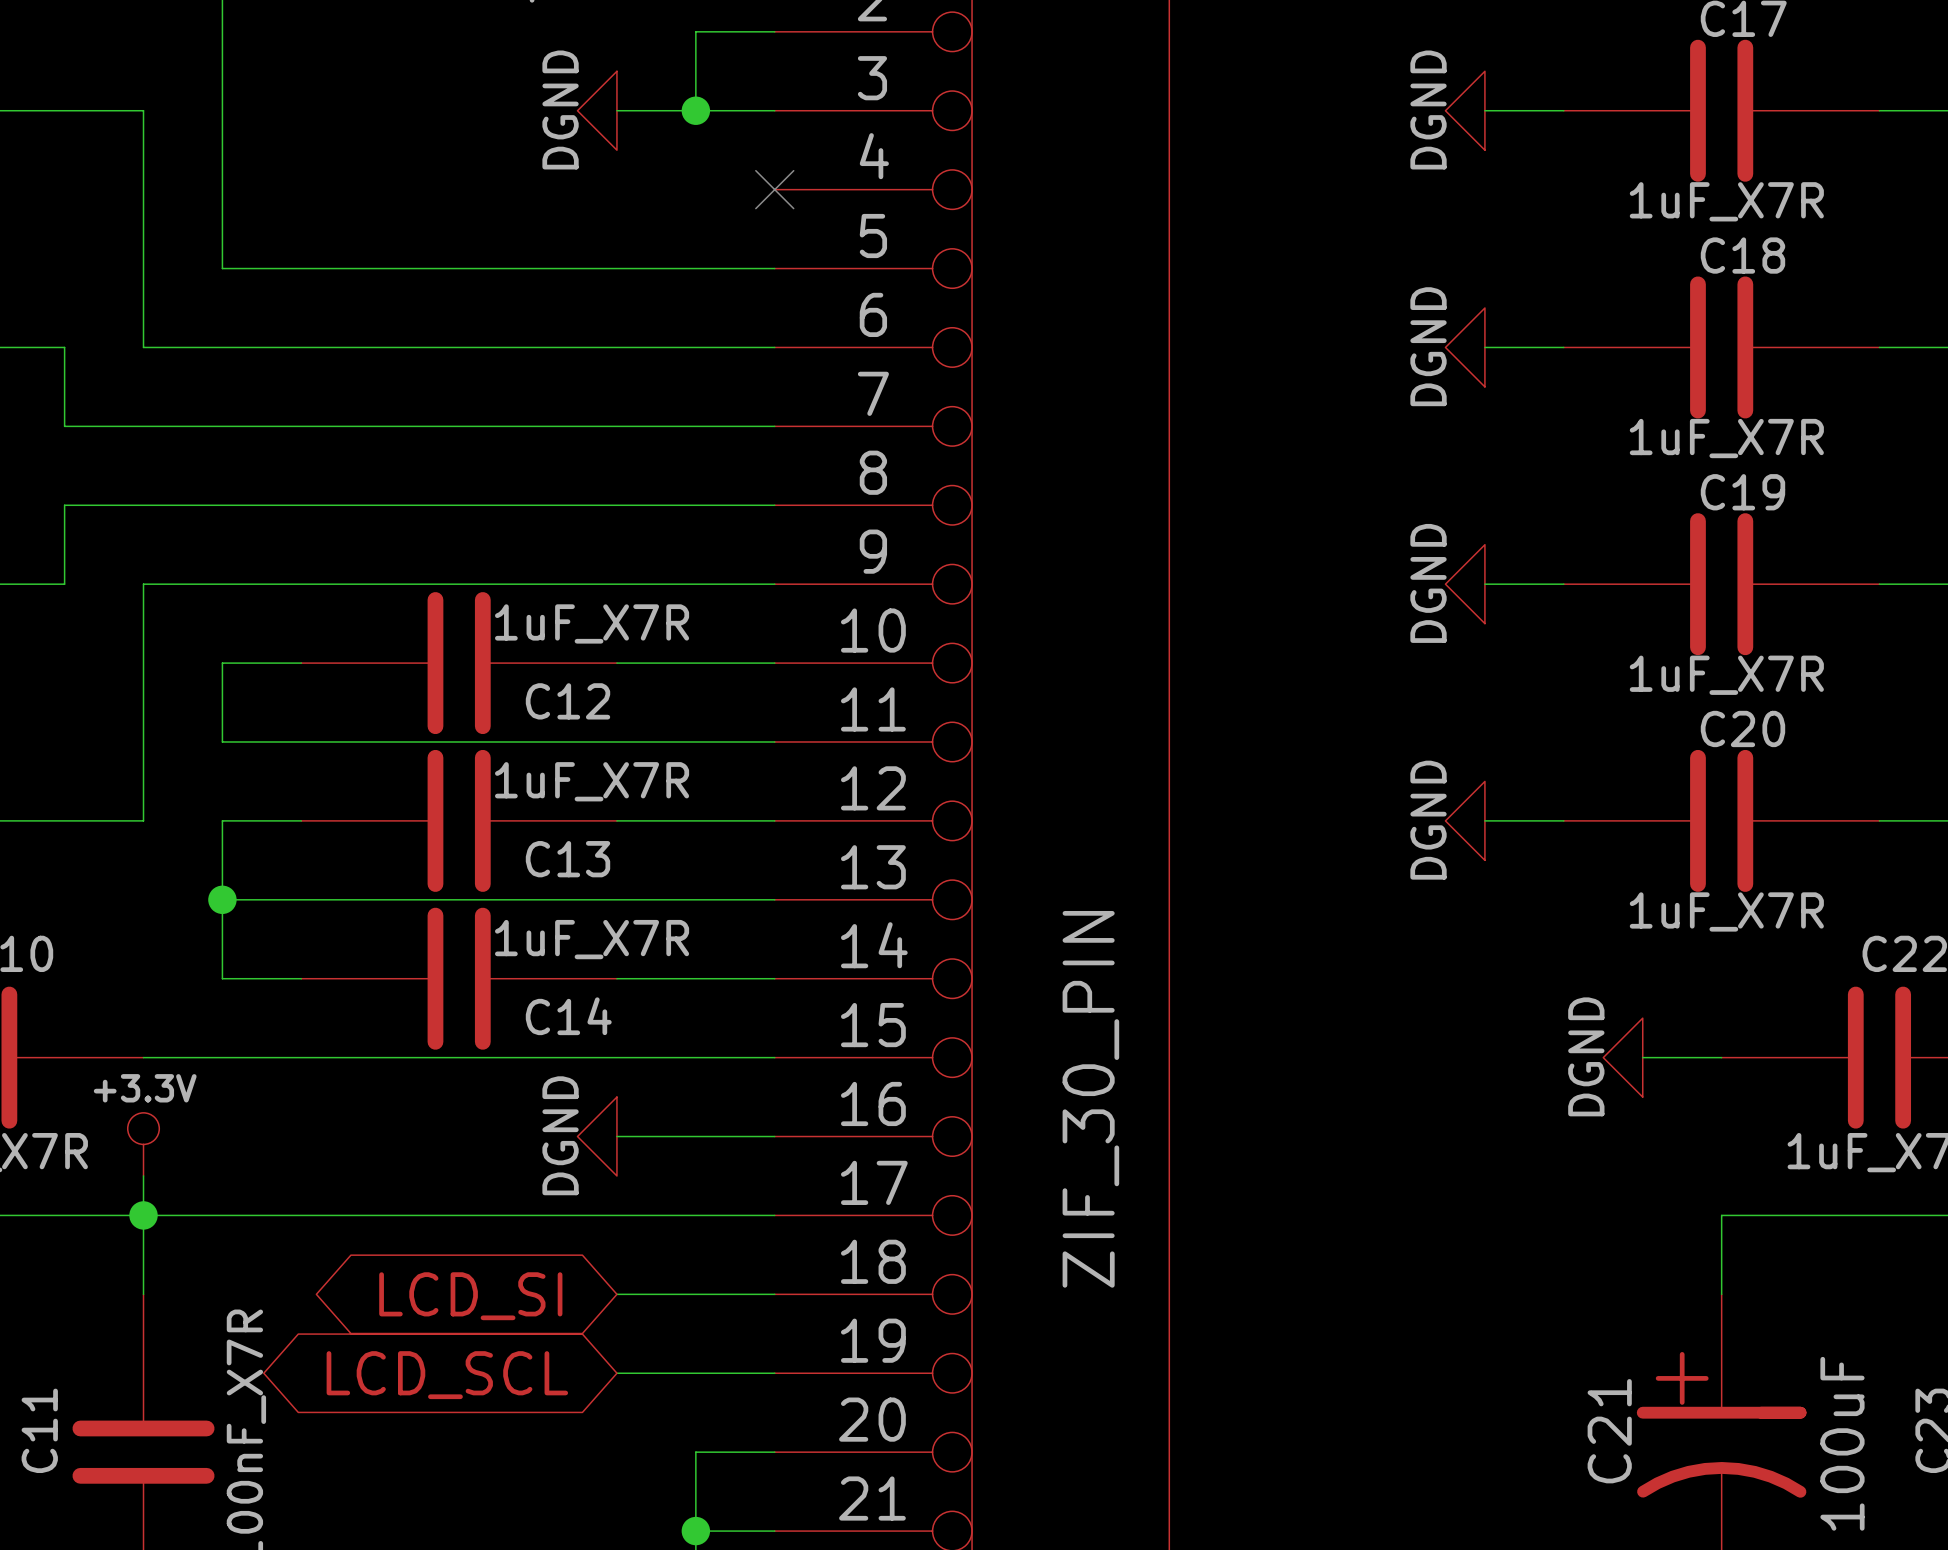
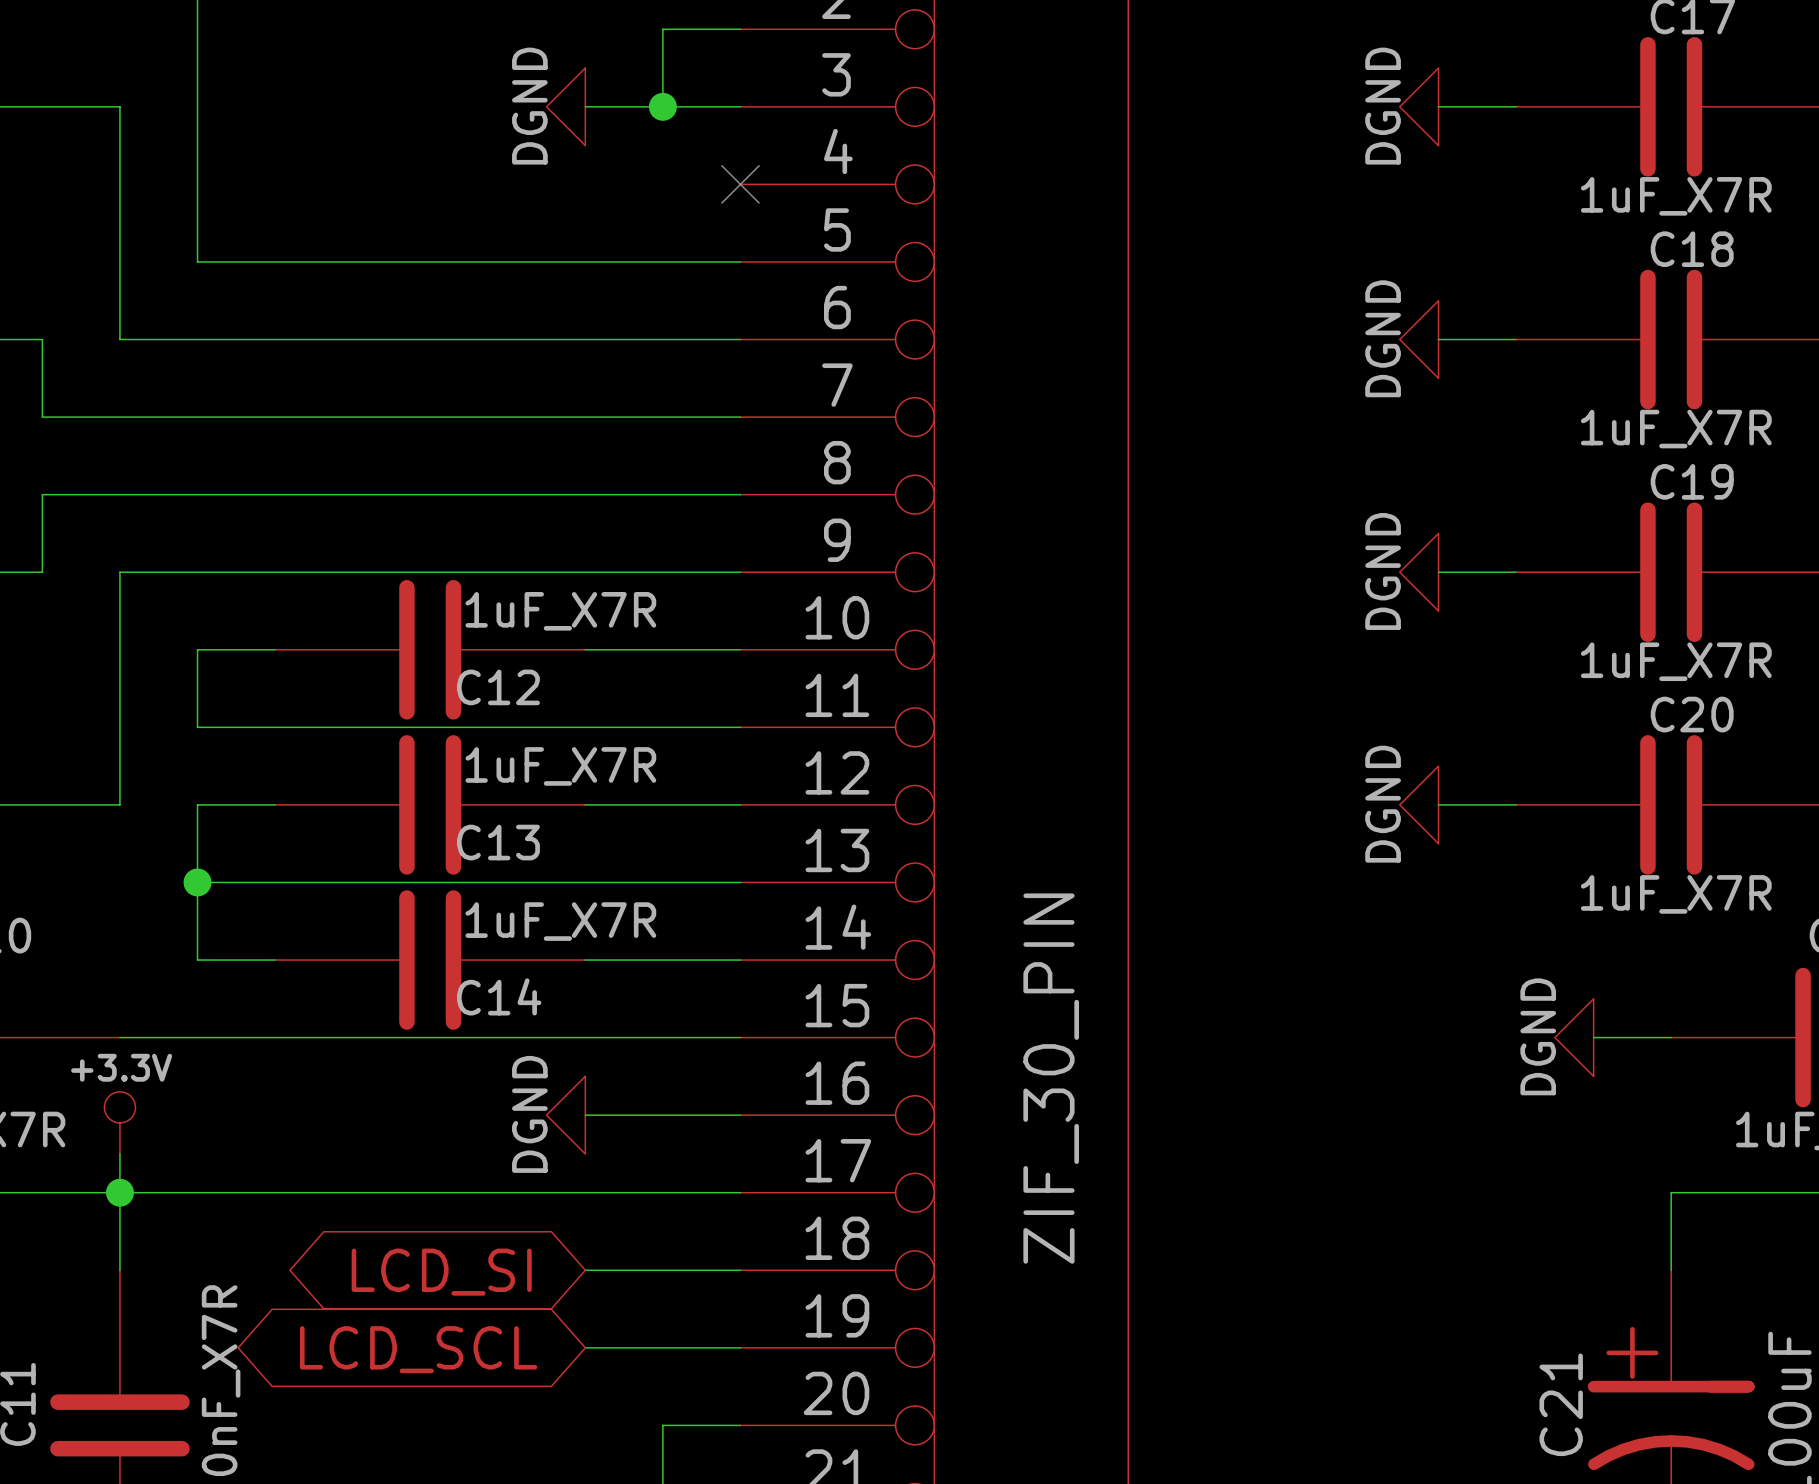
C12 name position: C12 (568, 701) -> C12 (498, 687)
C13 name position: C13 (568, 859) -> C13 (498, 842)
C14 name position: C14 (568, 1016) -> C14 (499, 996)

